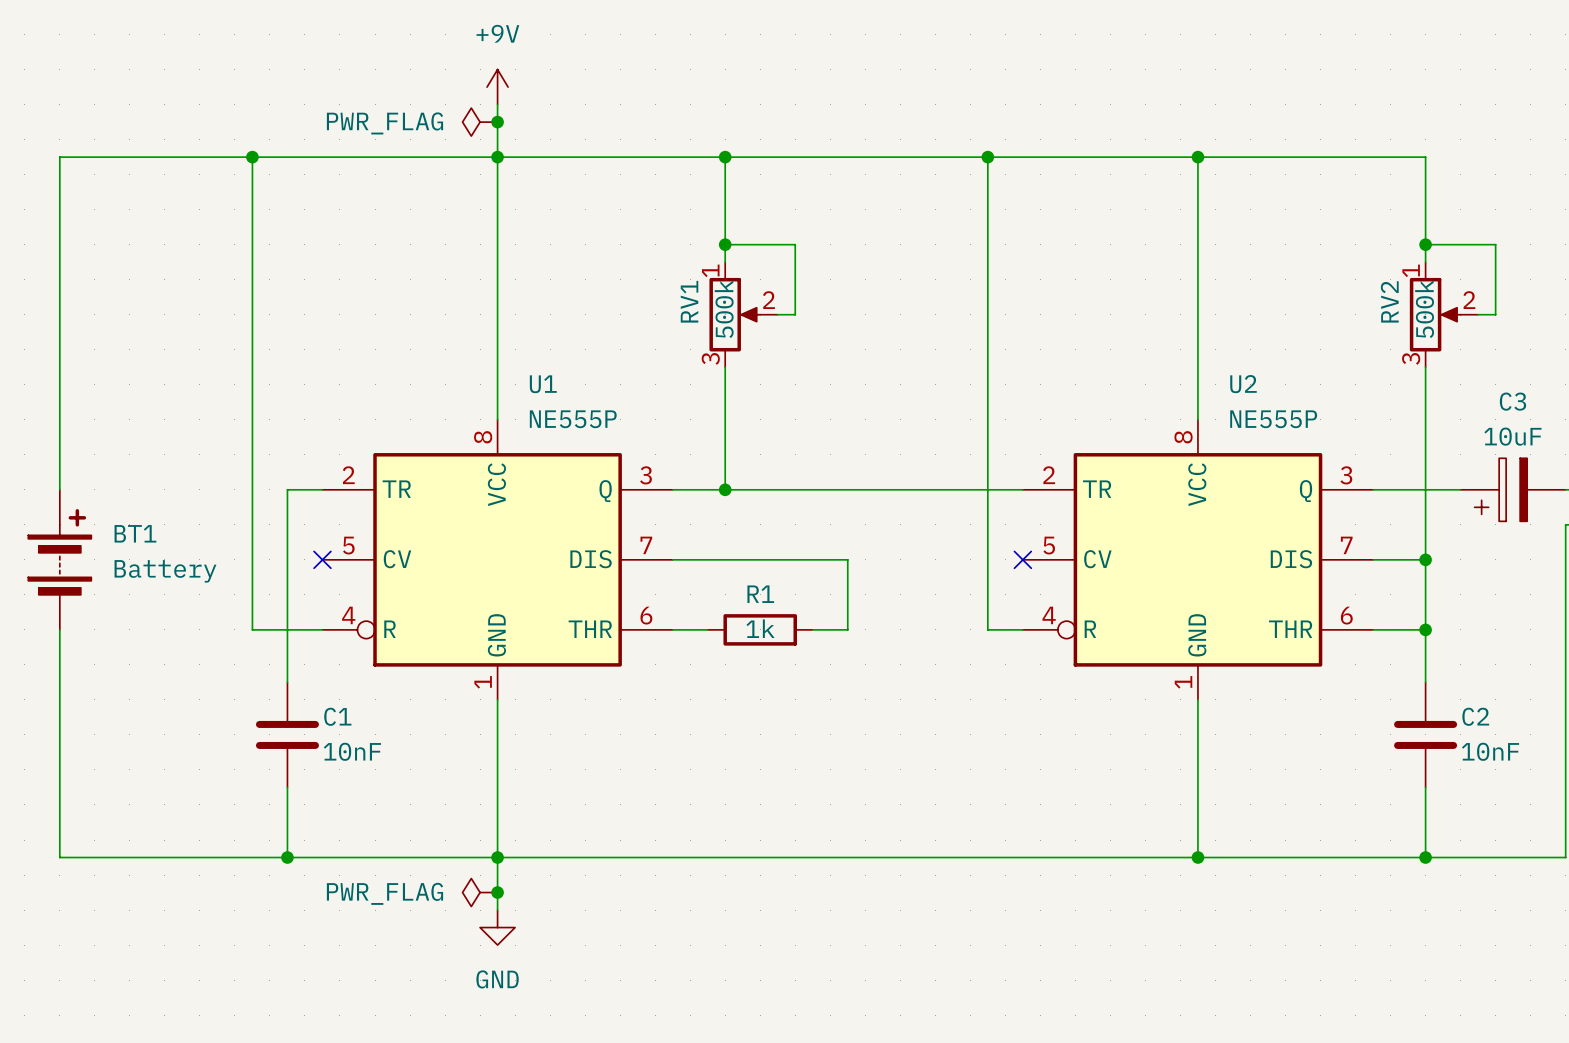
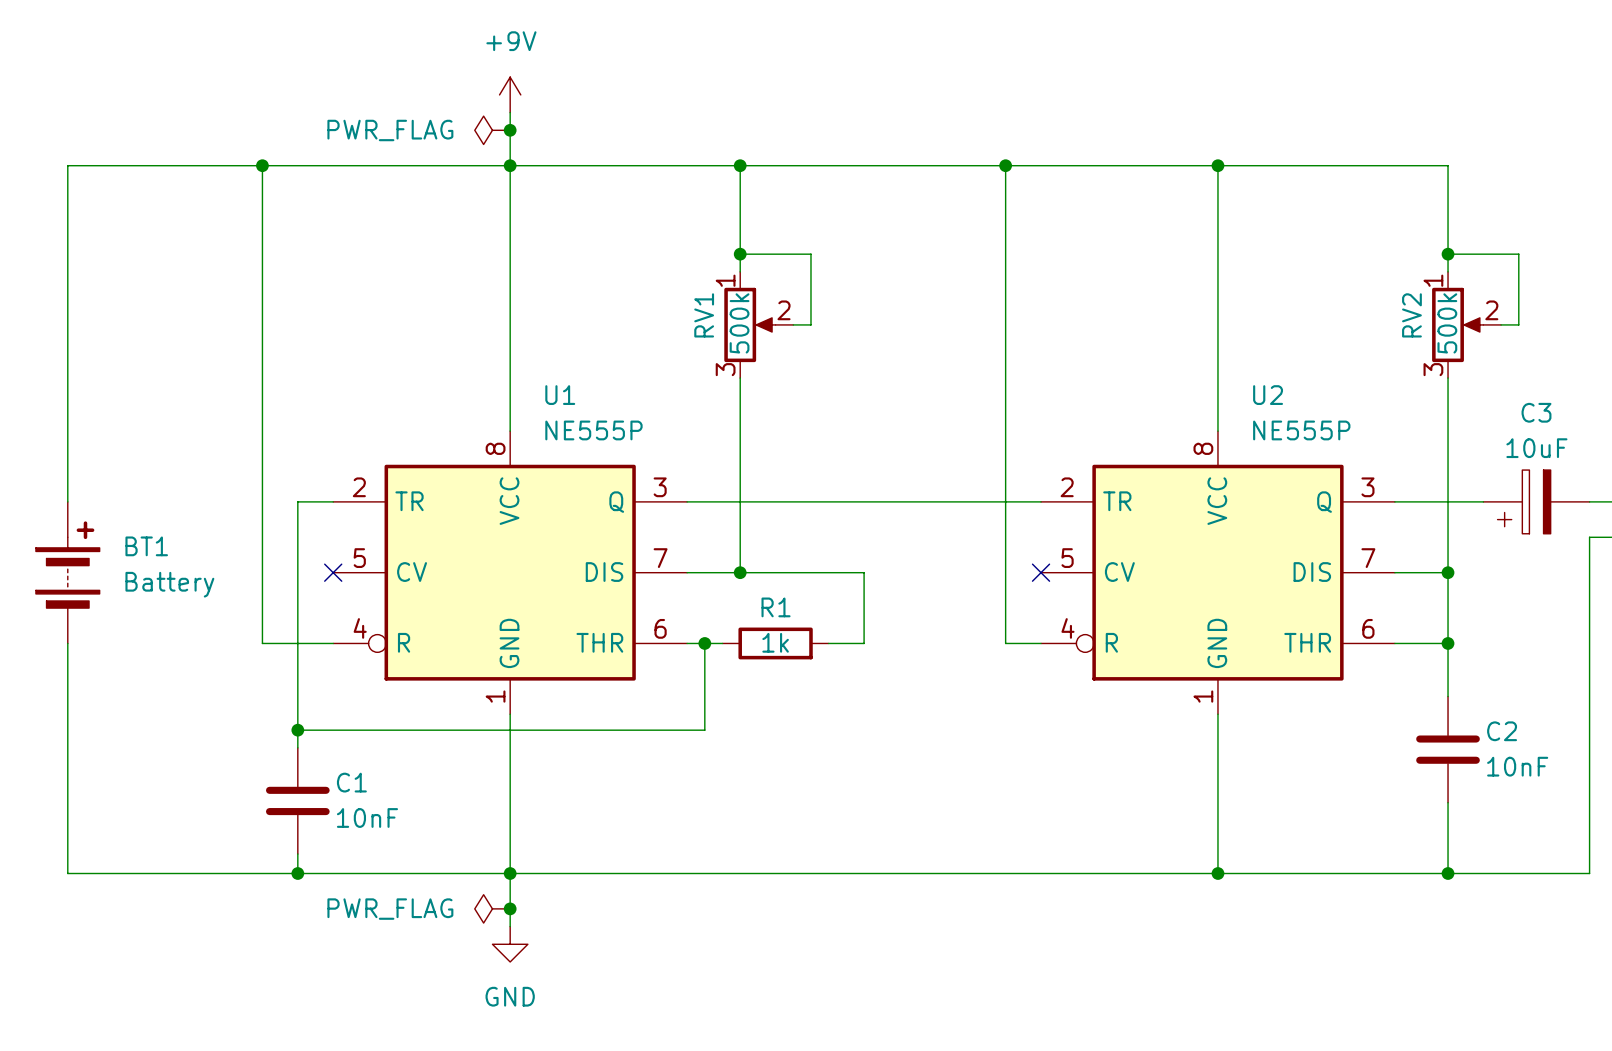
wire: none -> (740, 501) (740, 572)
junction position: (725, 489) -> (740, 572)
wire: none -> (704, 643) (704, 730) (297, 730)
junction: none -> (704, 643)
junction: none -> (297, 730)
C1 position: (287, 734) -> (297, 800)

